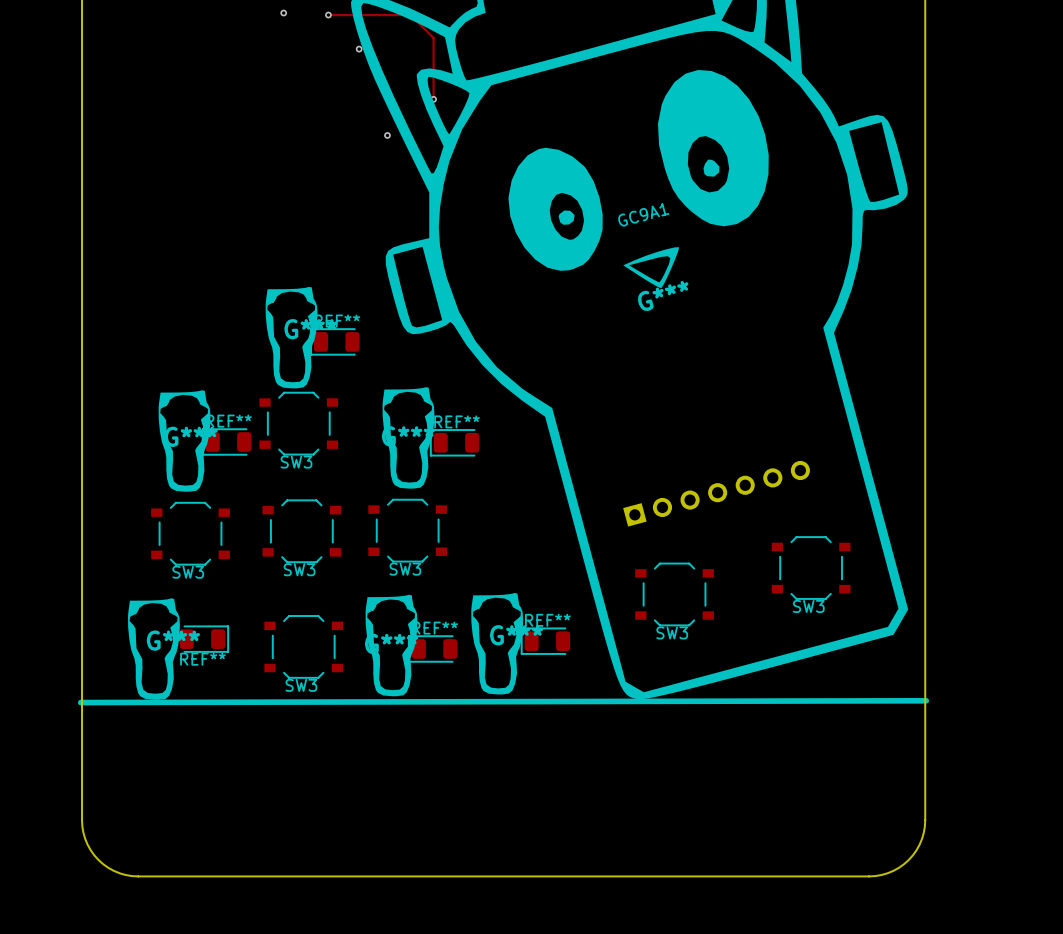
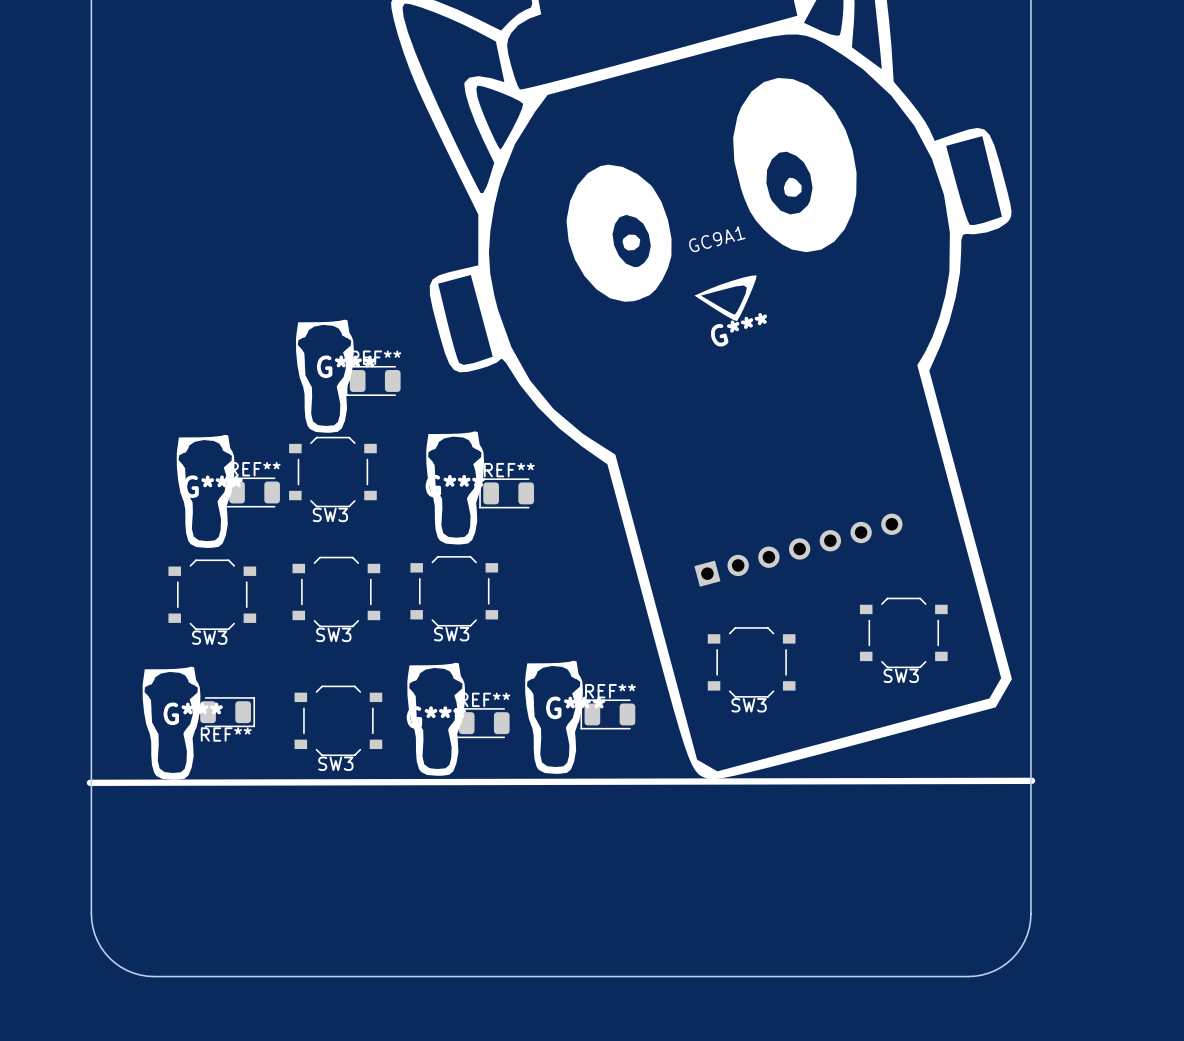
via: (283, 13) -> none
track: (328, 15) (410, 15) (433, 37) (433, 99) -> none
via: (328, 15) -> none
via: (359, 49) -> none
via: (433, 99) -> none
via: (387, 135) -> none

